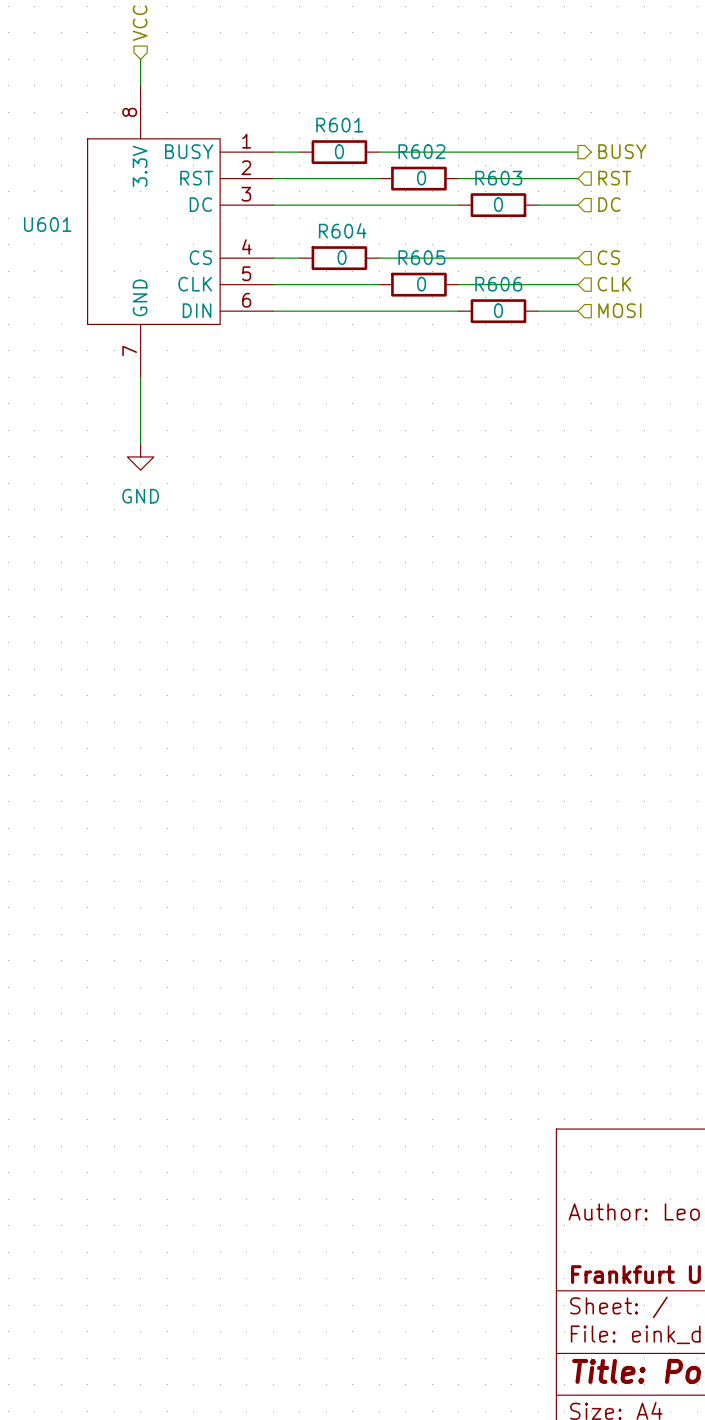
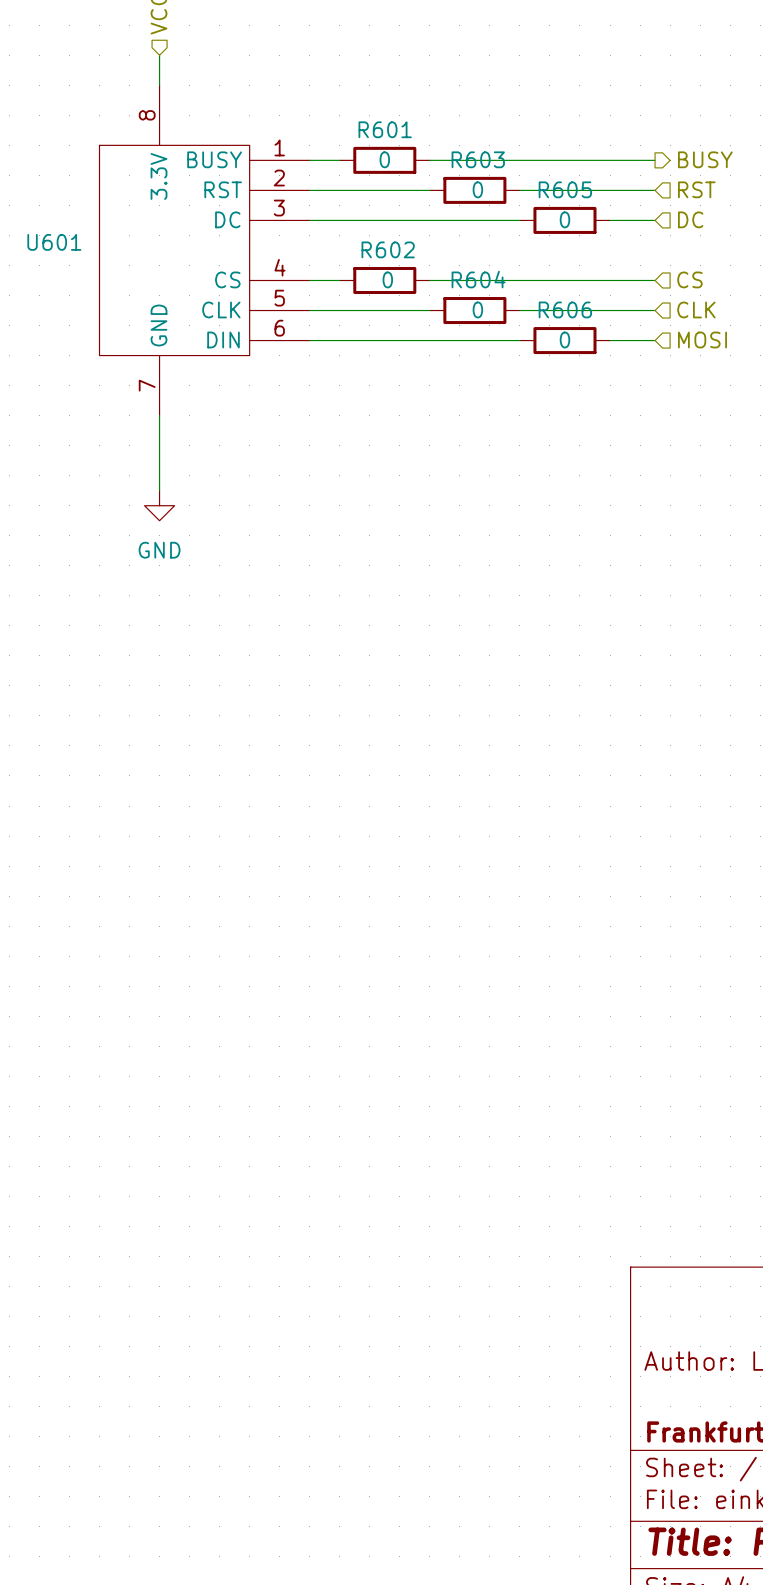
R602 name: R602 (421, 151) -> R603 (478, 159)
R603 name: R603 (498, 178) -> R605 (565, 189)
R604 name: R604 (342, 230) -> R602 (388, 249)
R605 name: R605 (421, 257) -> R604 (478, 279)

